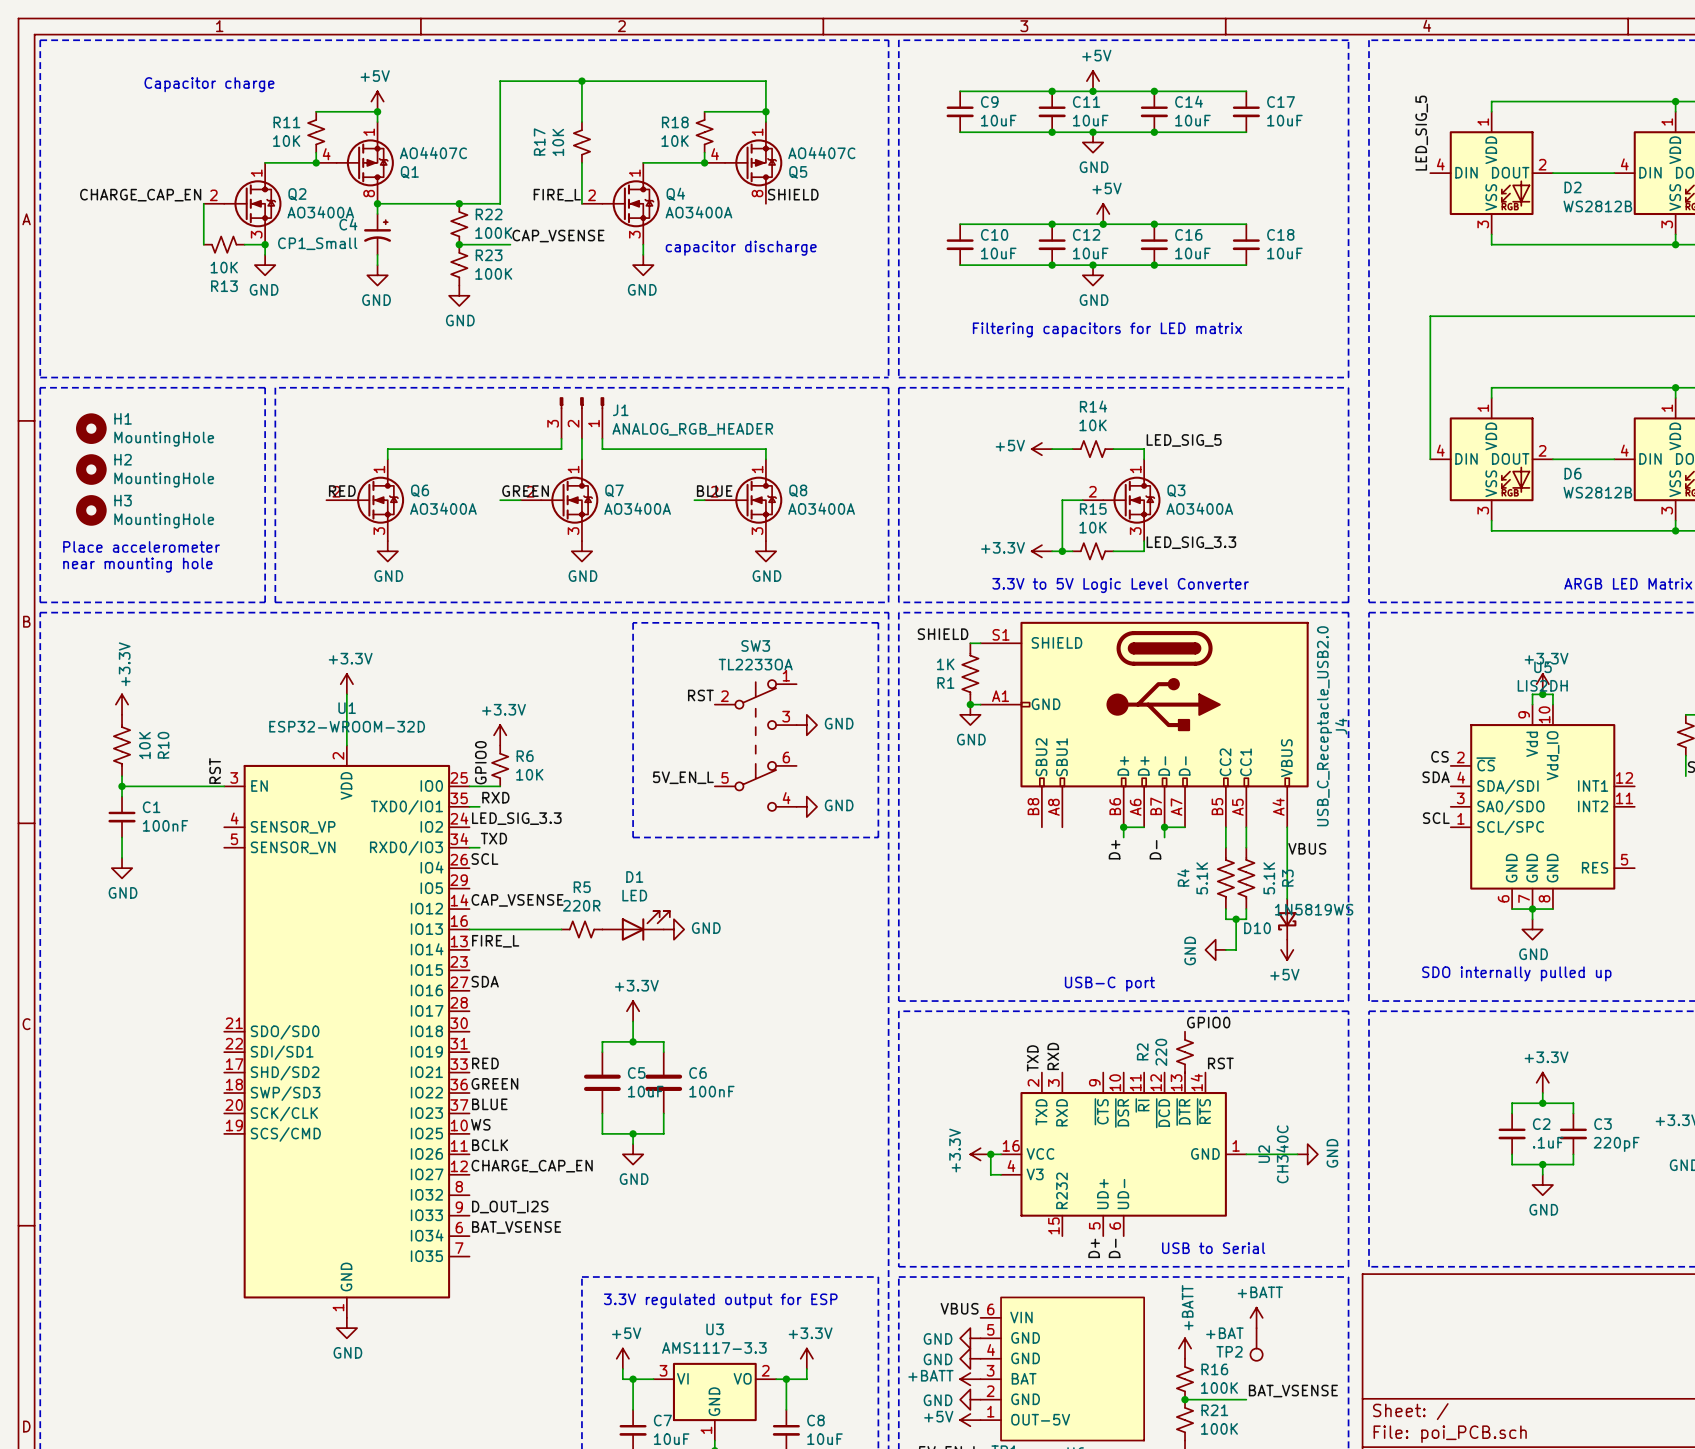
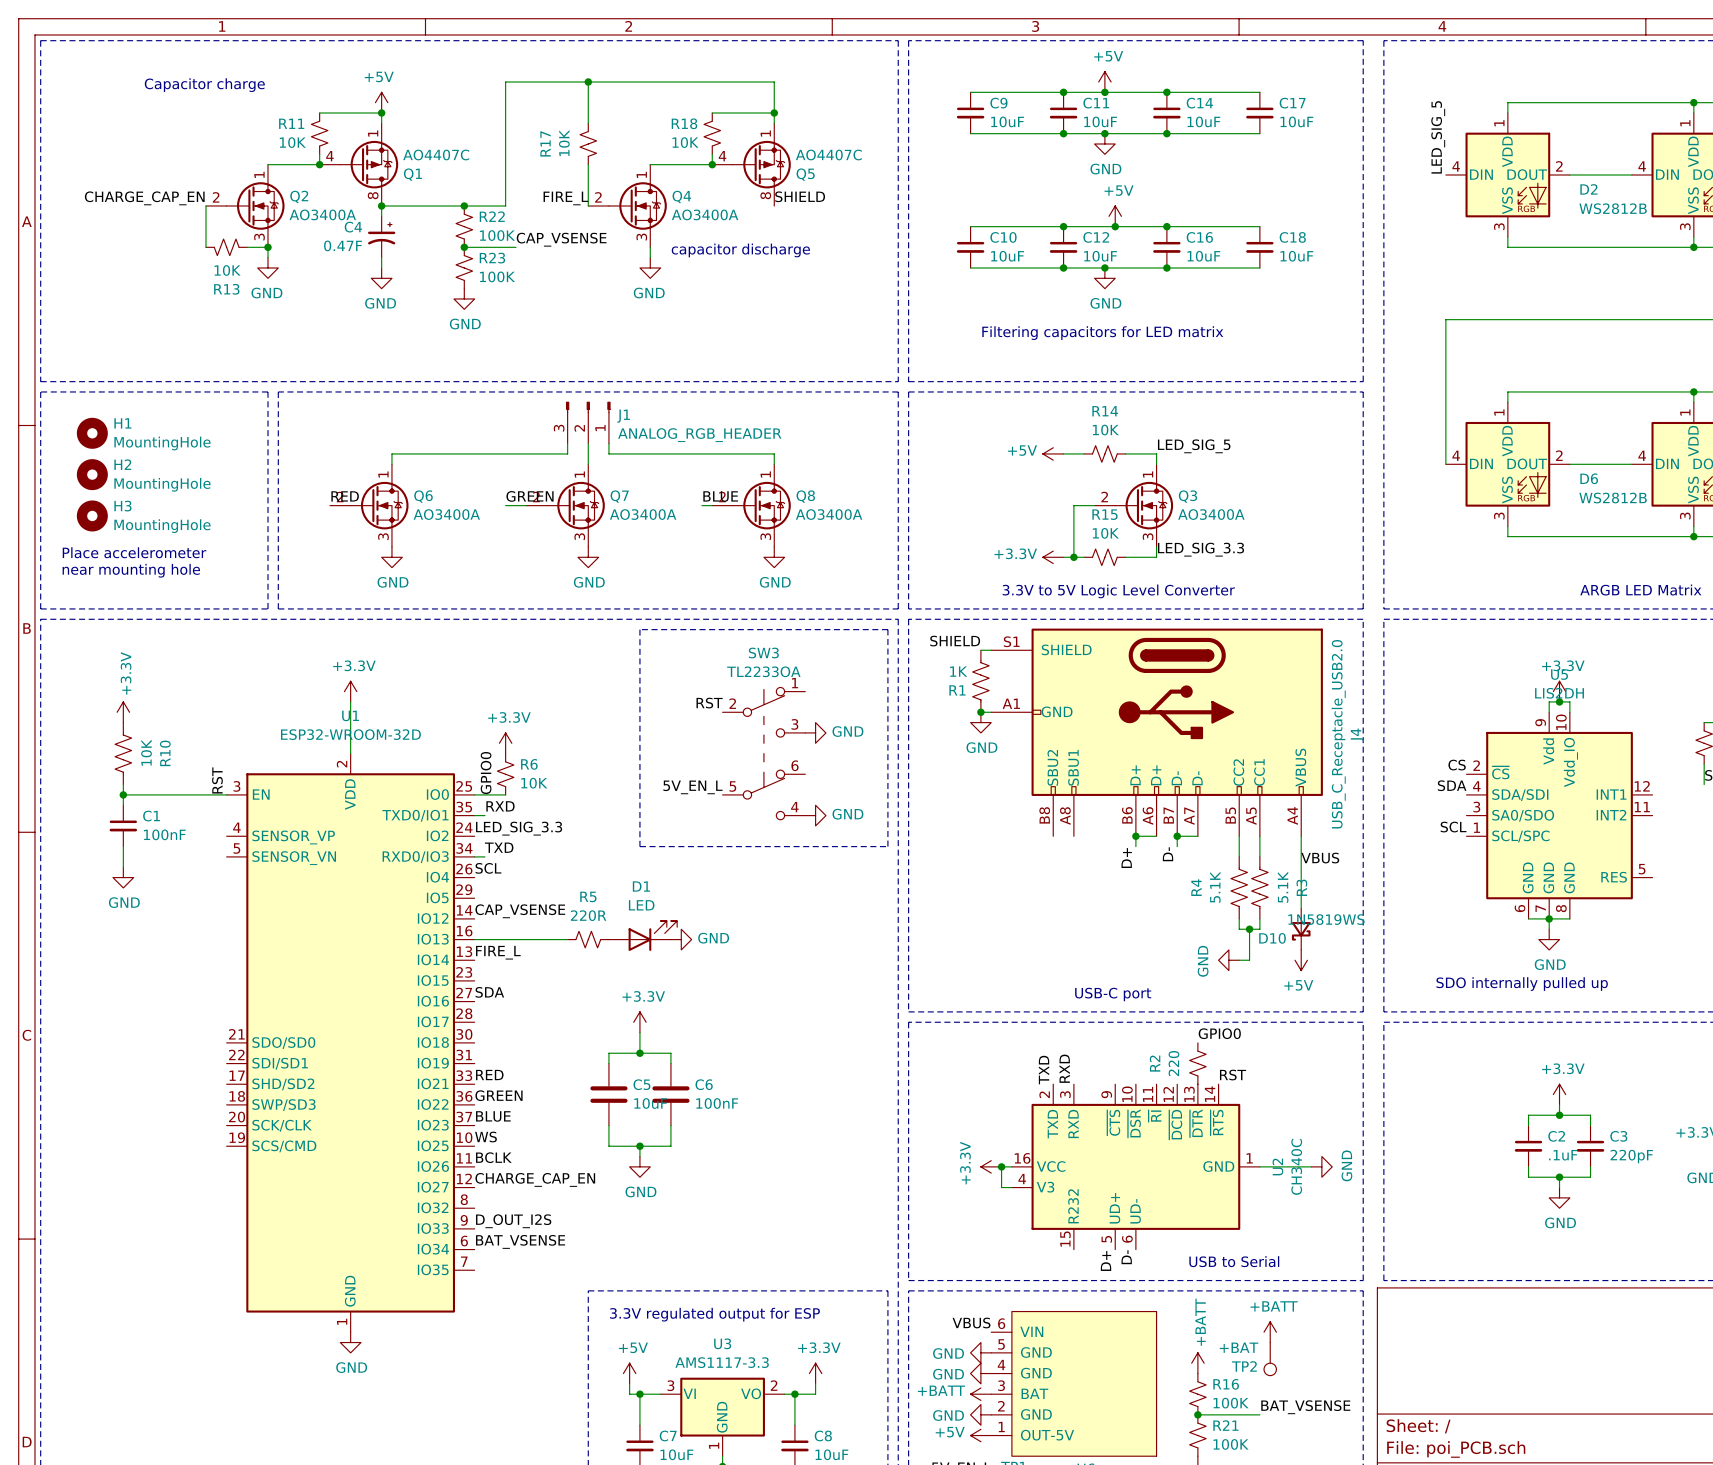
C4 value: CP1_Small (317, 243) -> 0.47F (343, 245)

